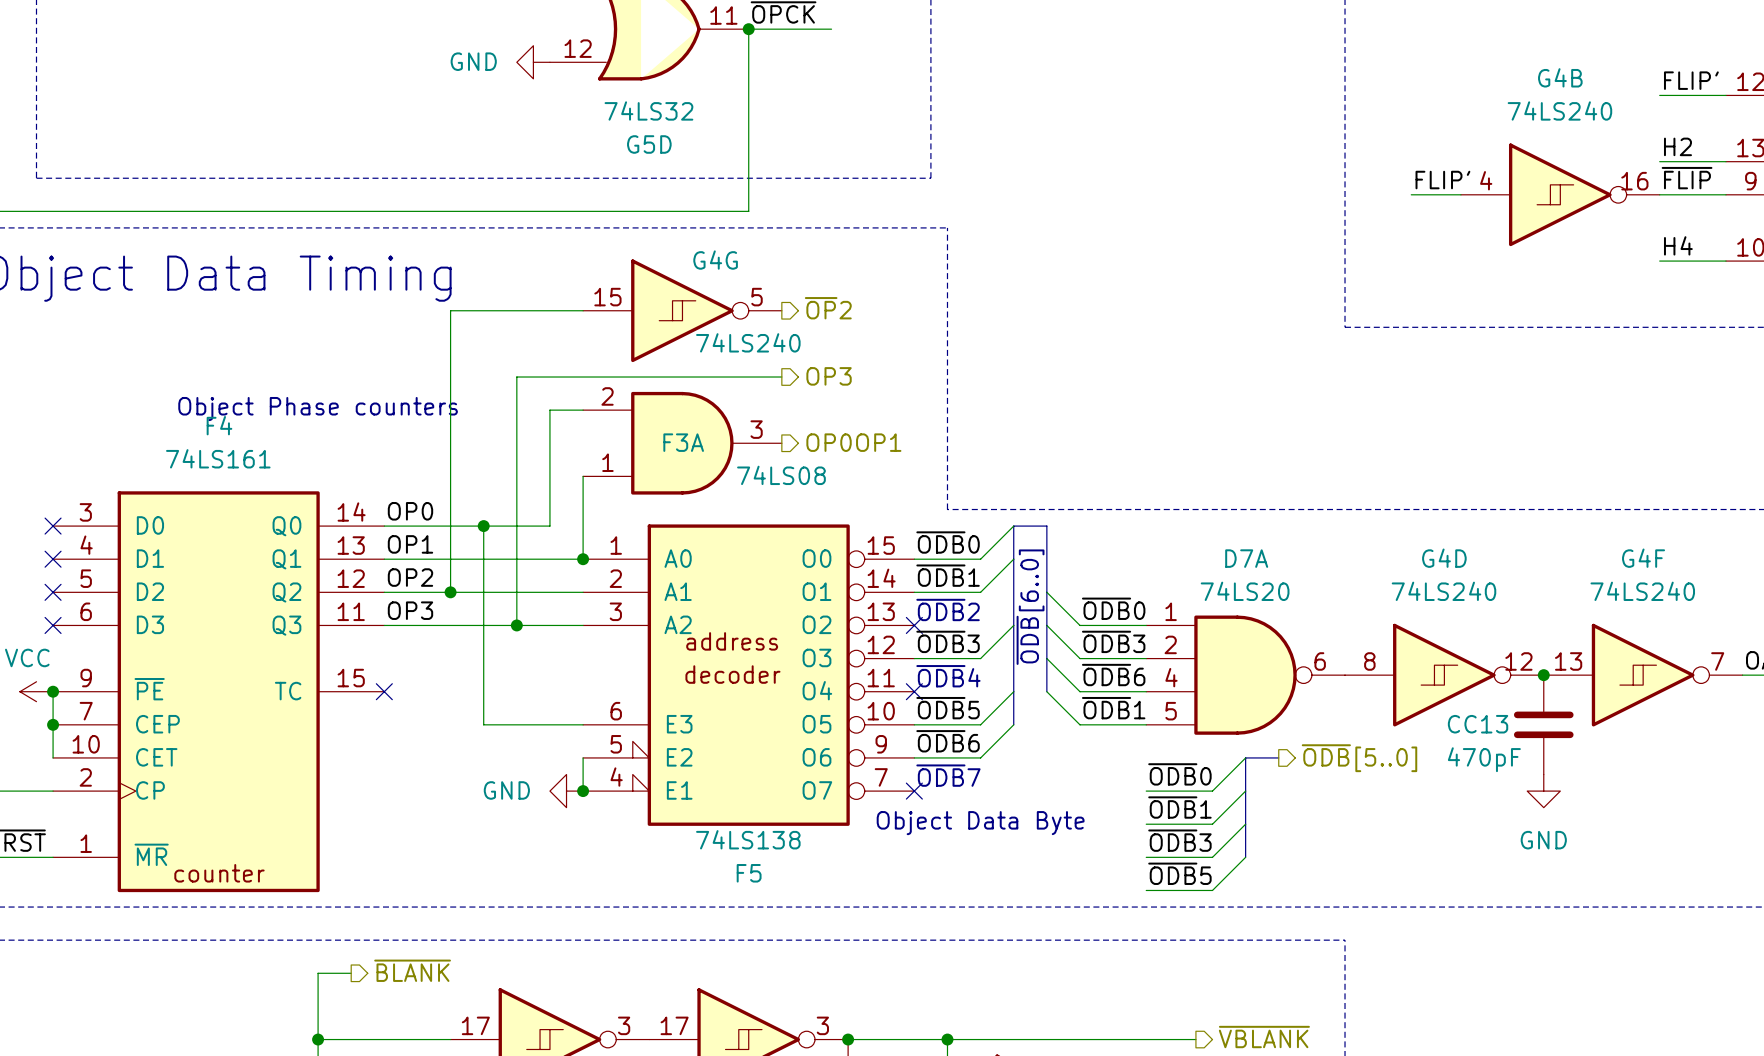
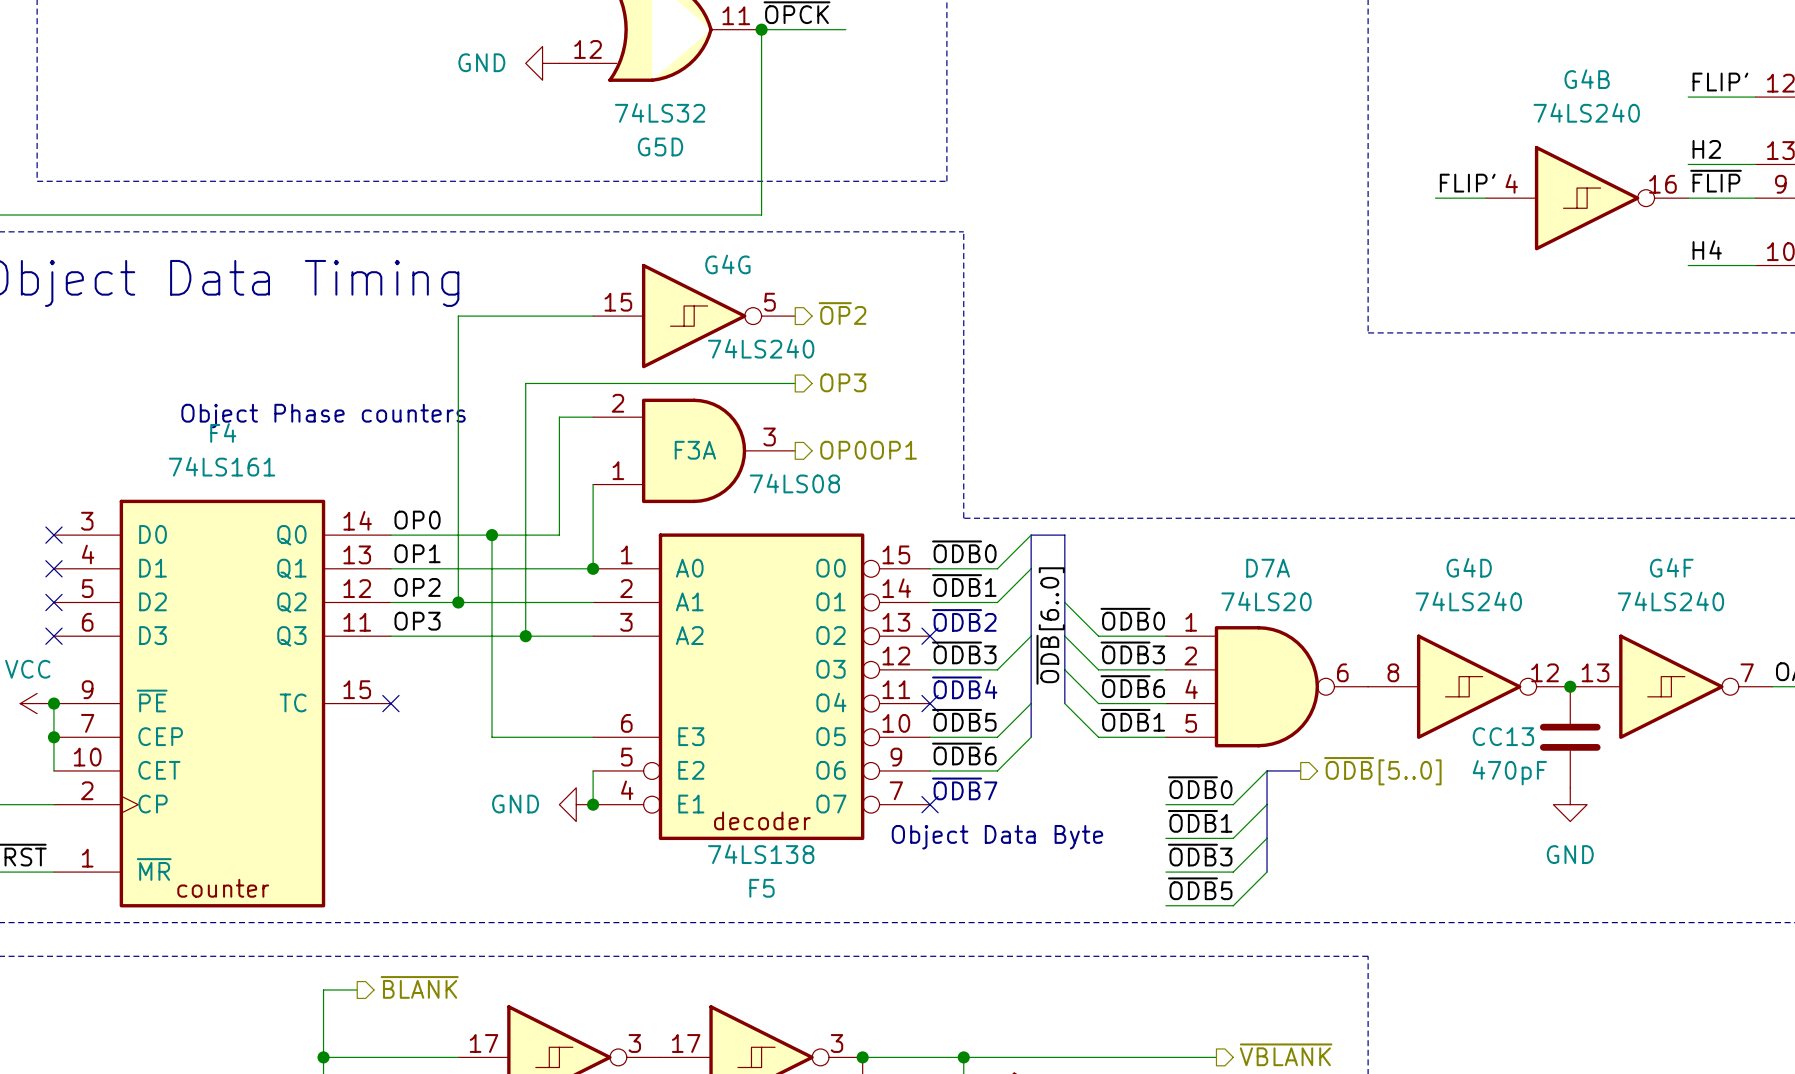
F5 symbol: [583, 524, 915, 826] -> [593, 533, 931, 841]
text: ~{ODB}[6..0] (1030, 607) -> none
label: none -> ~{ODB}[6..0] (1050, 626)

